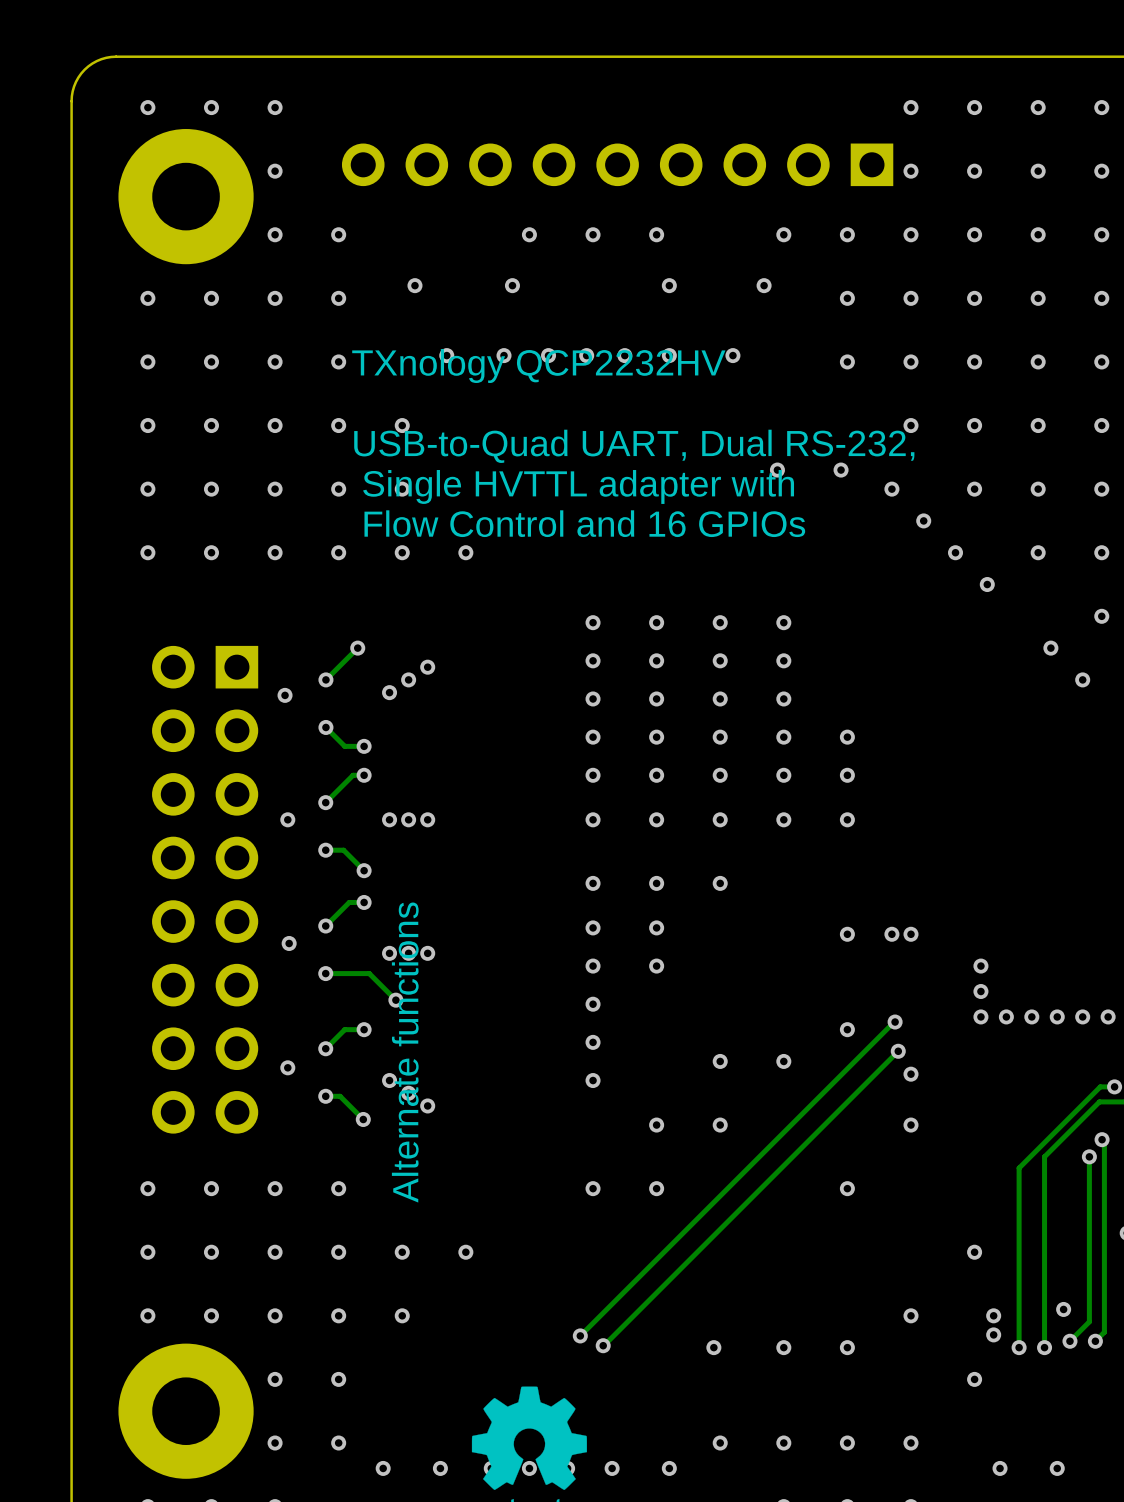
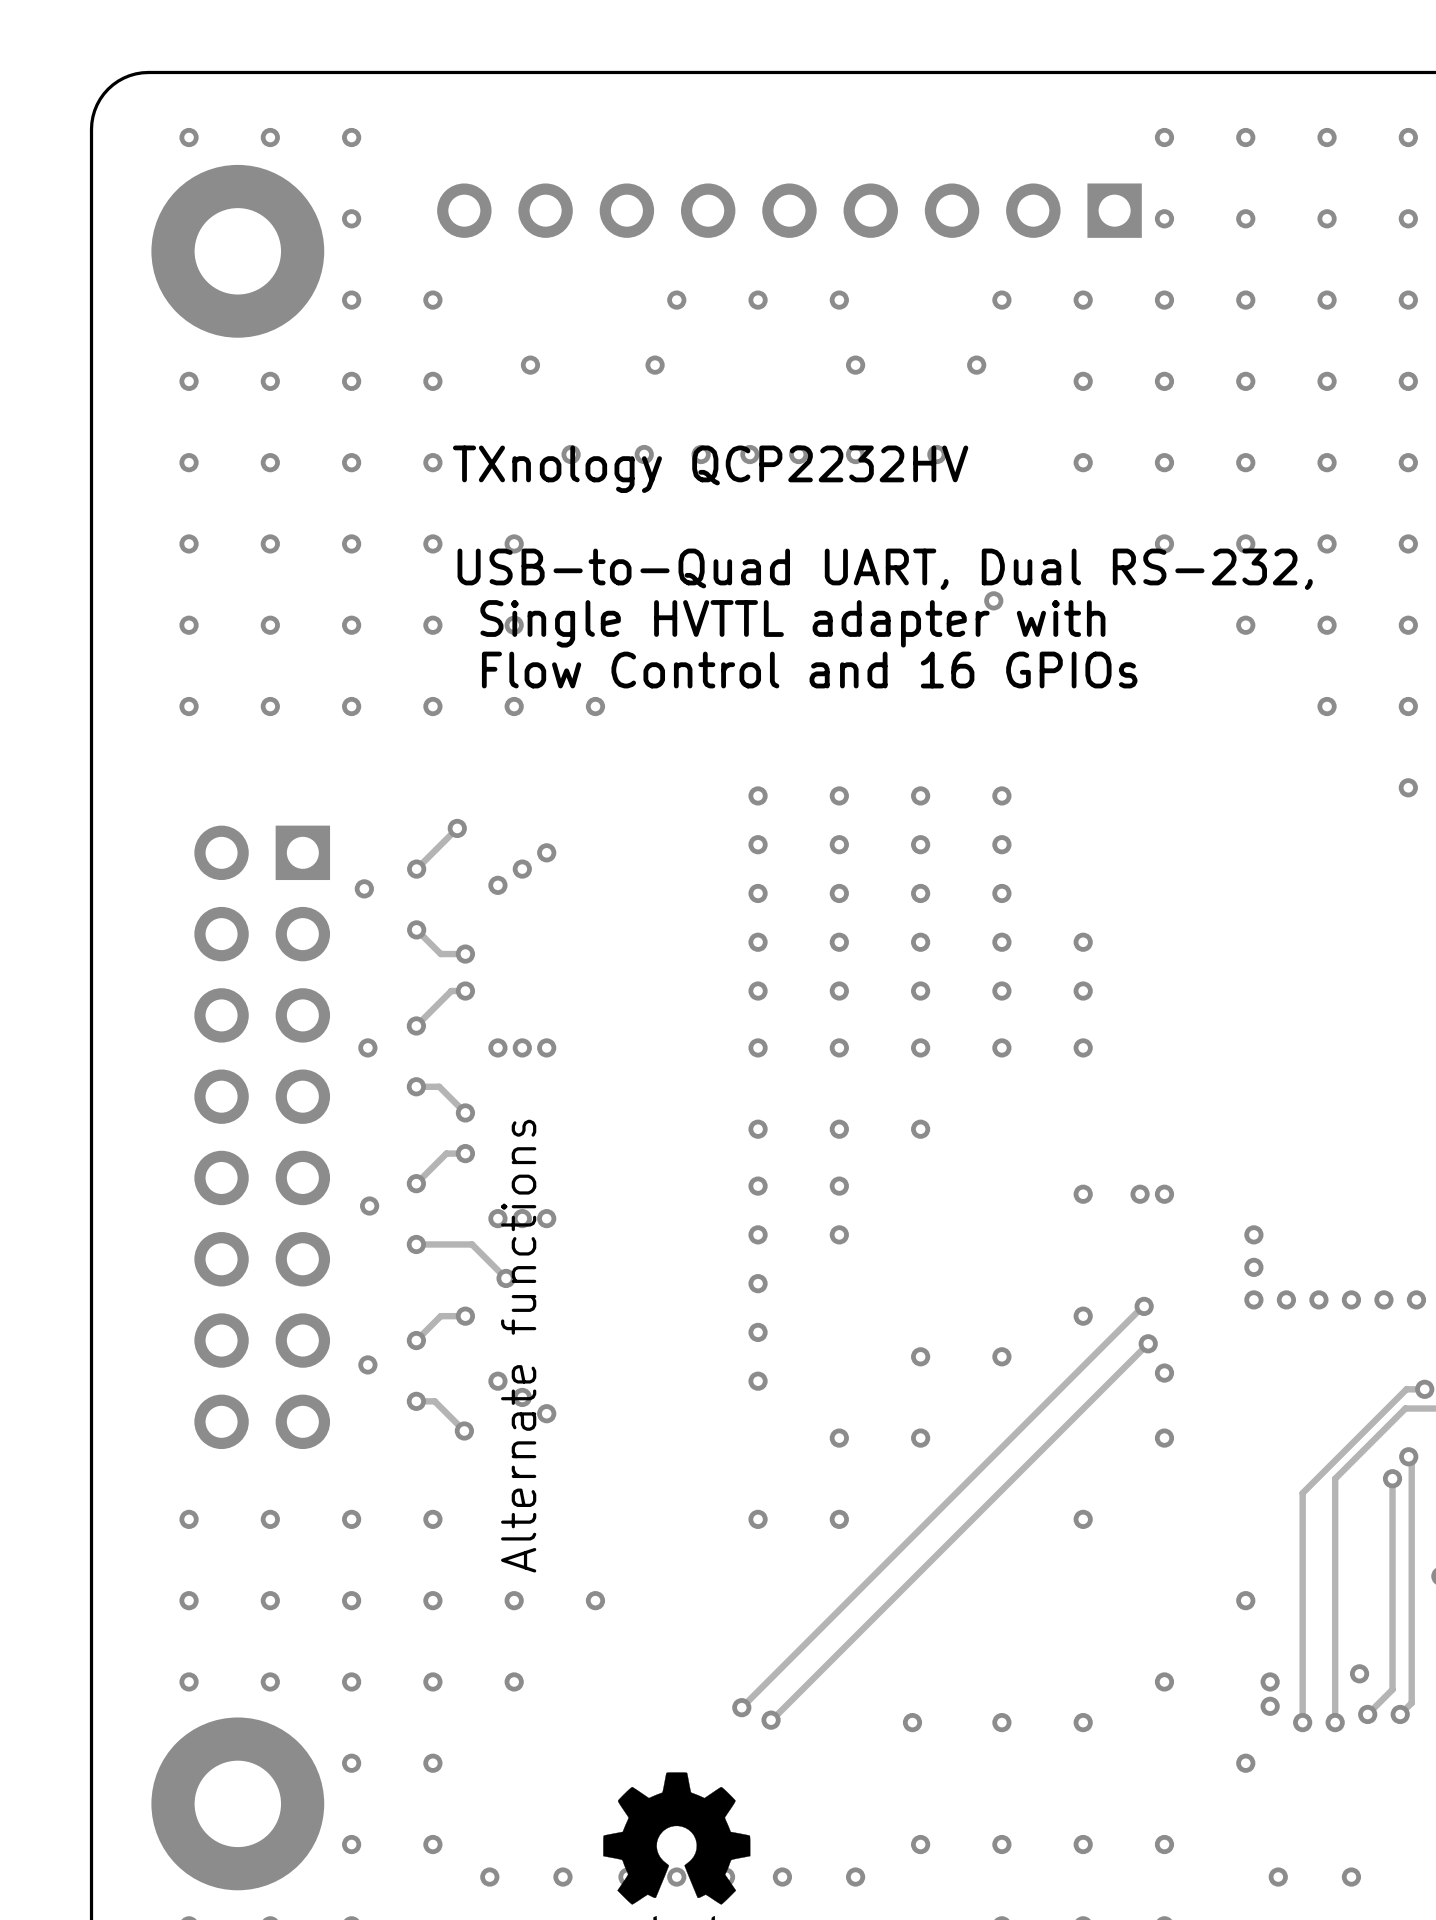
via: (841, 470) -> none
via: (891, 489) -> none
via: (923, 520) -> none
via: (955, 552) -> none
via: (987, 584) -> none
via: (1050, 648) -> none
via: (1082, 679) -> none

